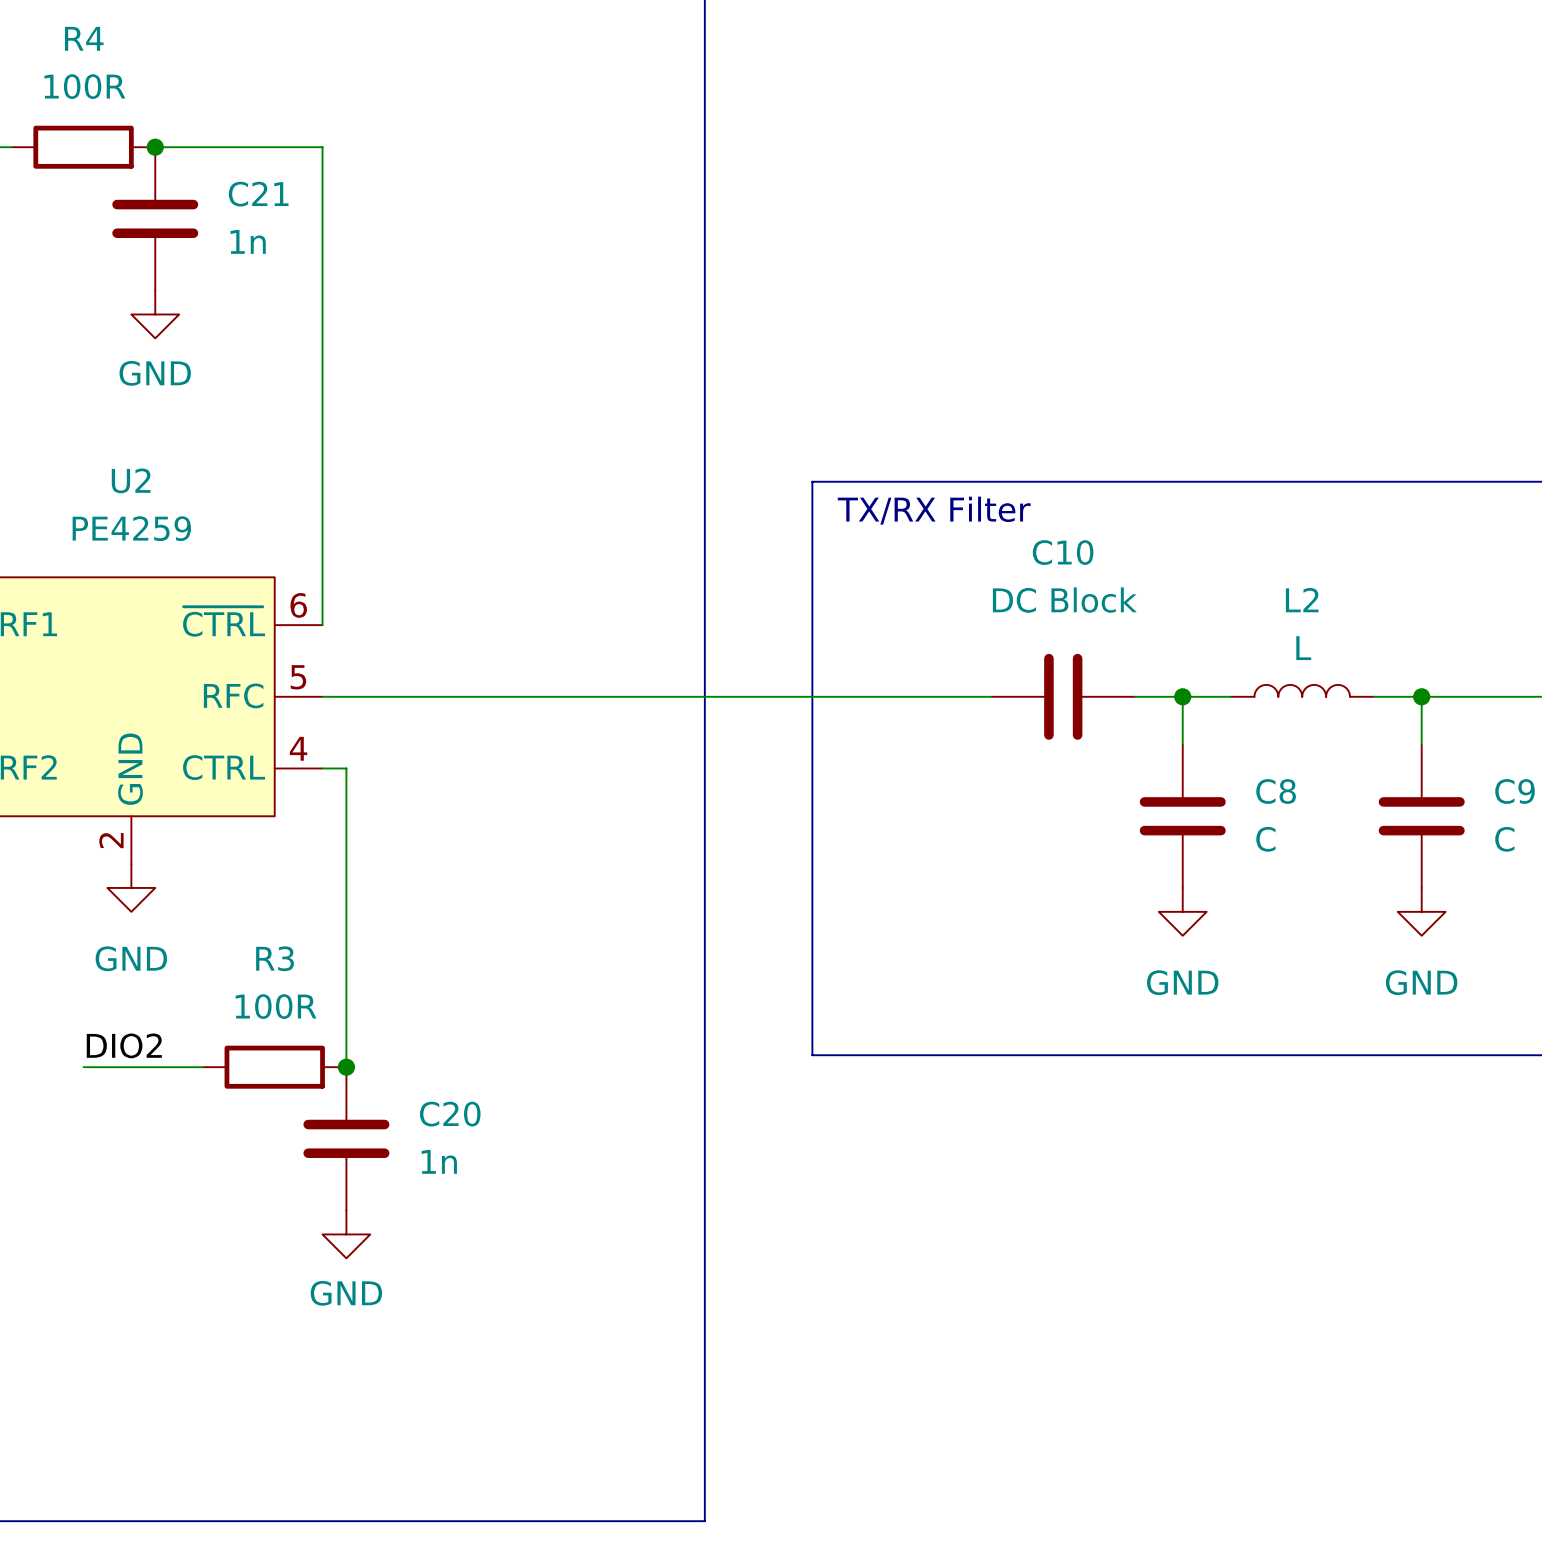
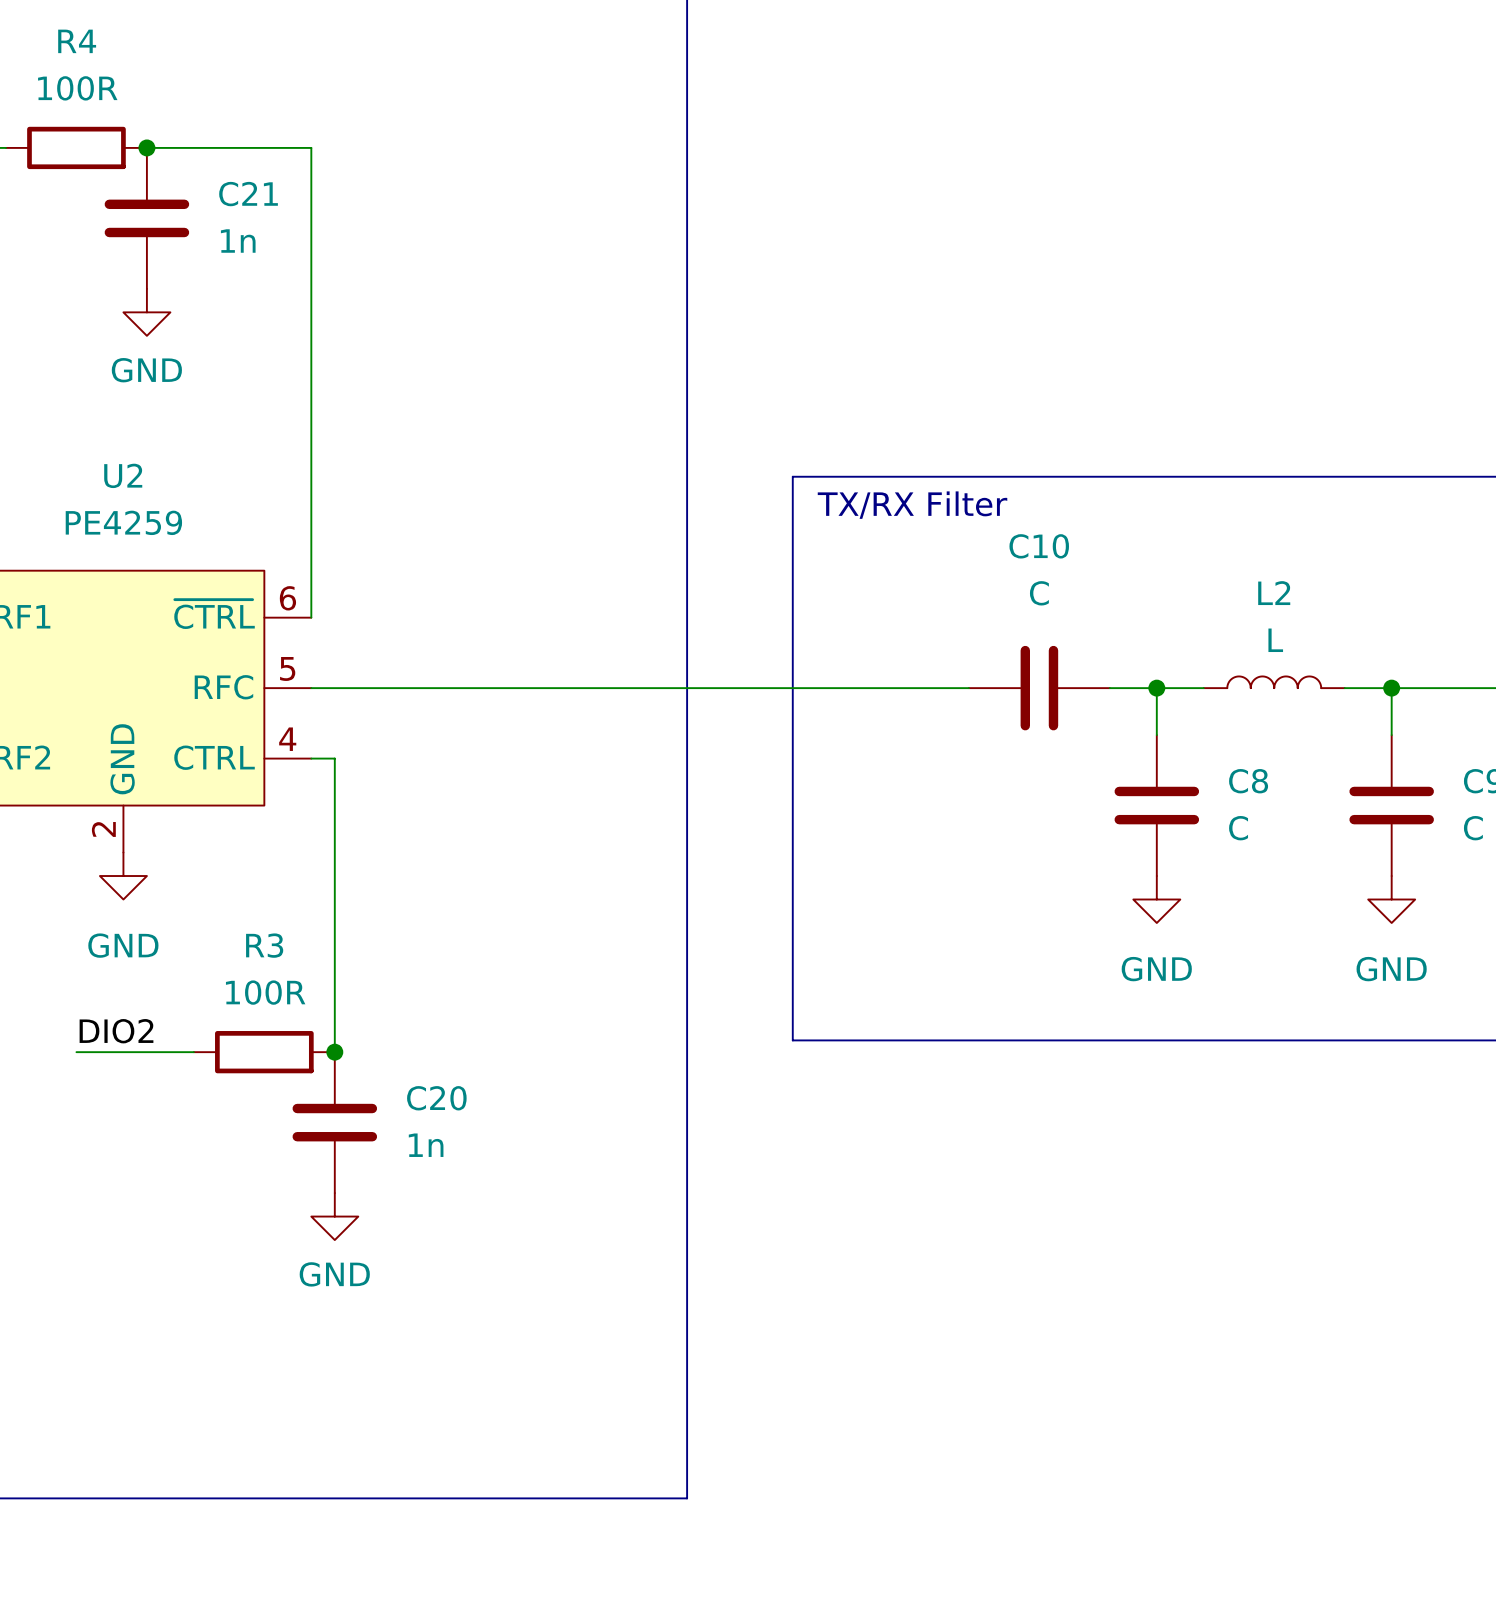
C10 value: DC Block (1064, 600) -> C (1039, 593)

